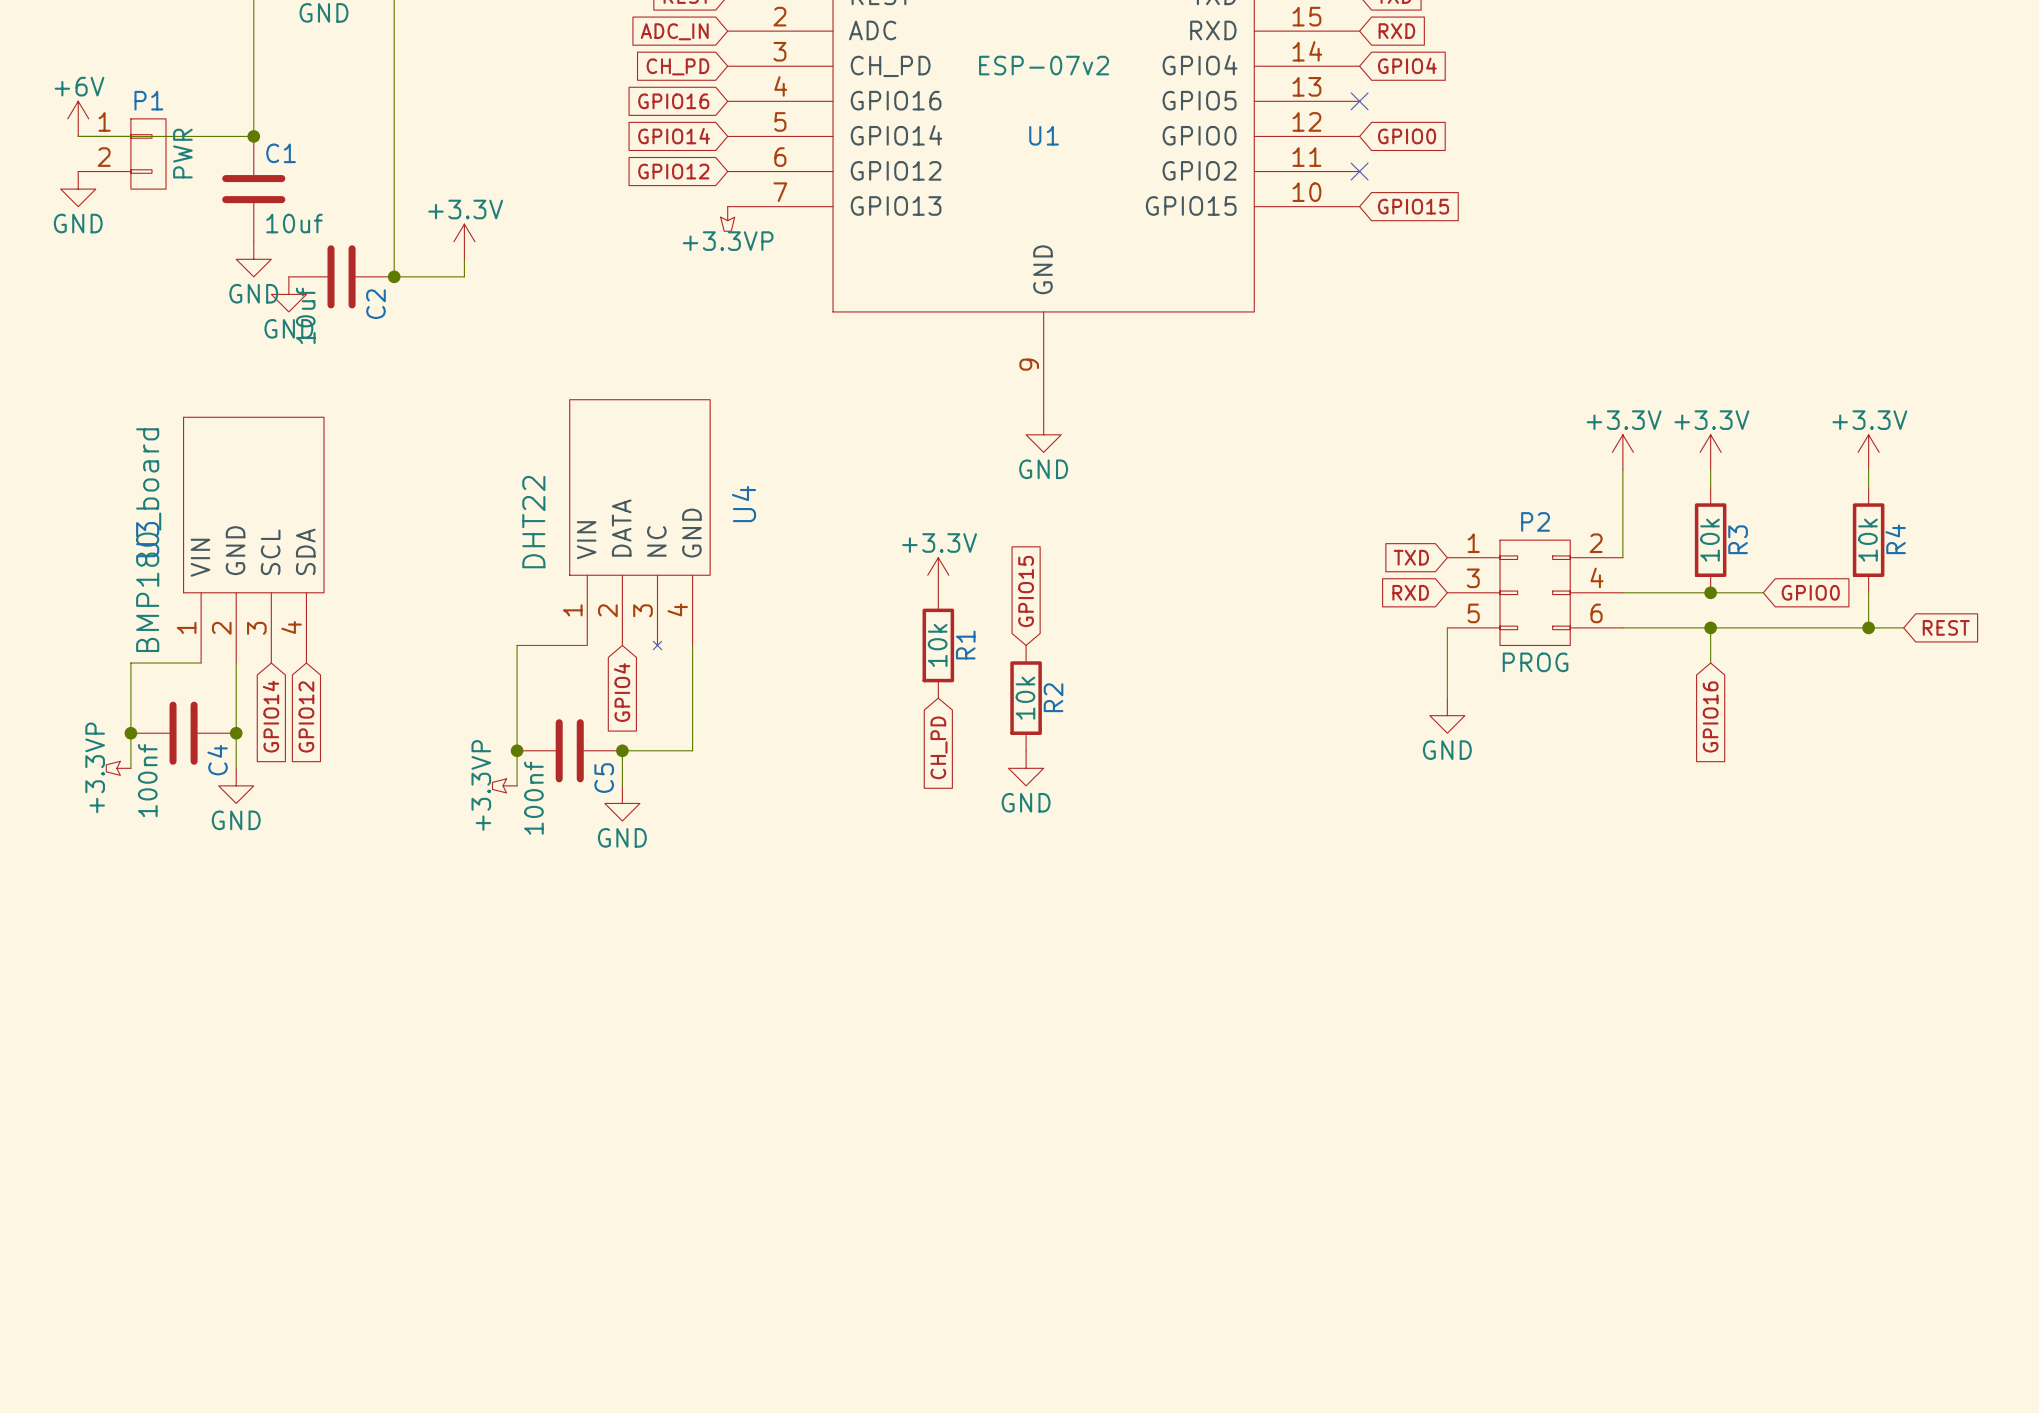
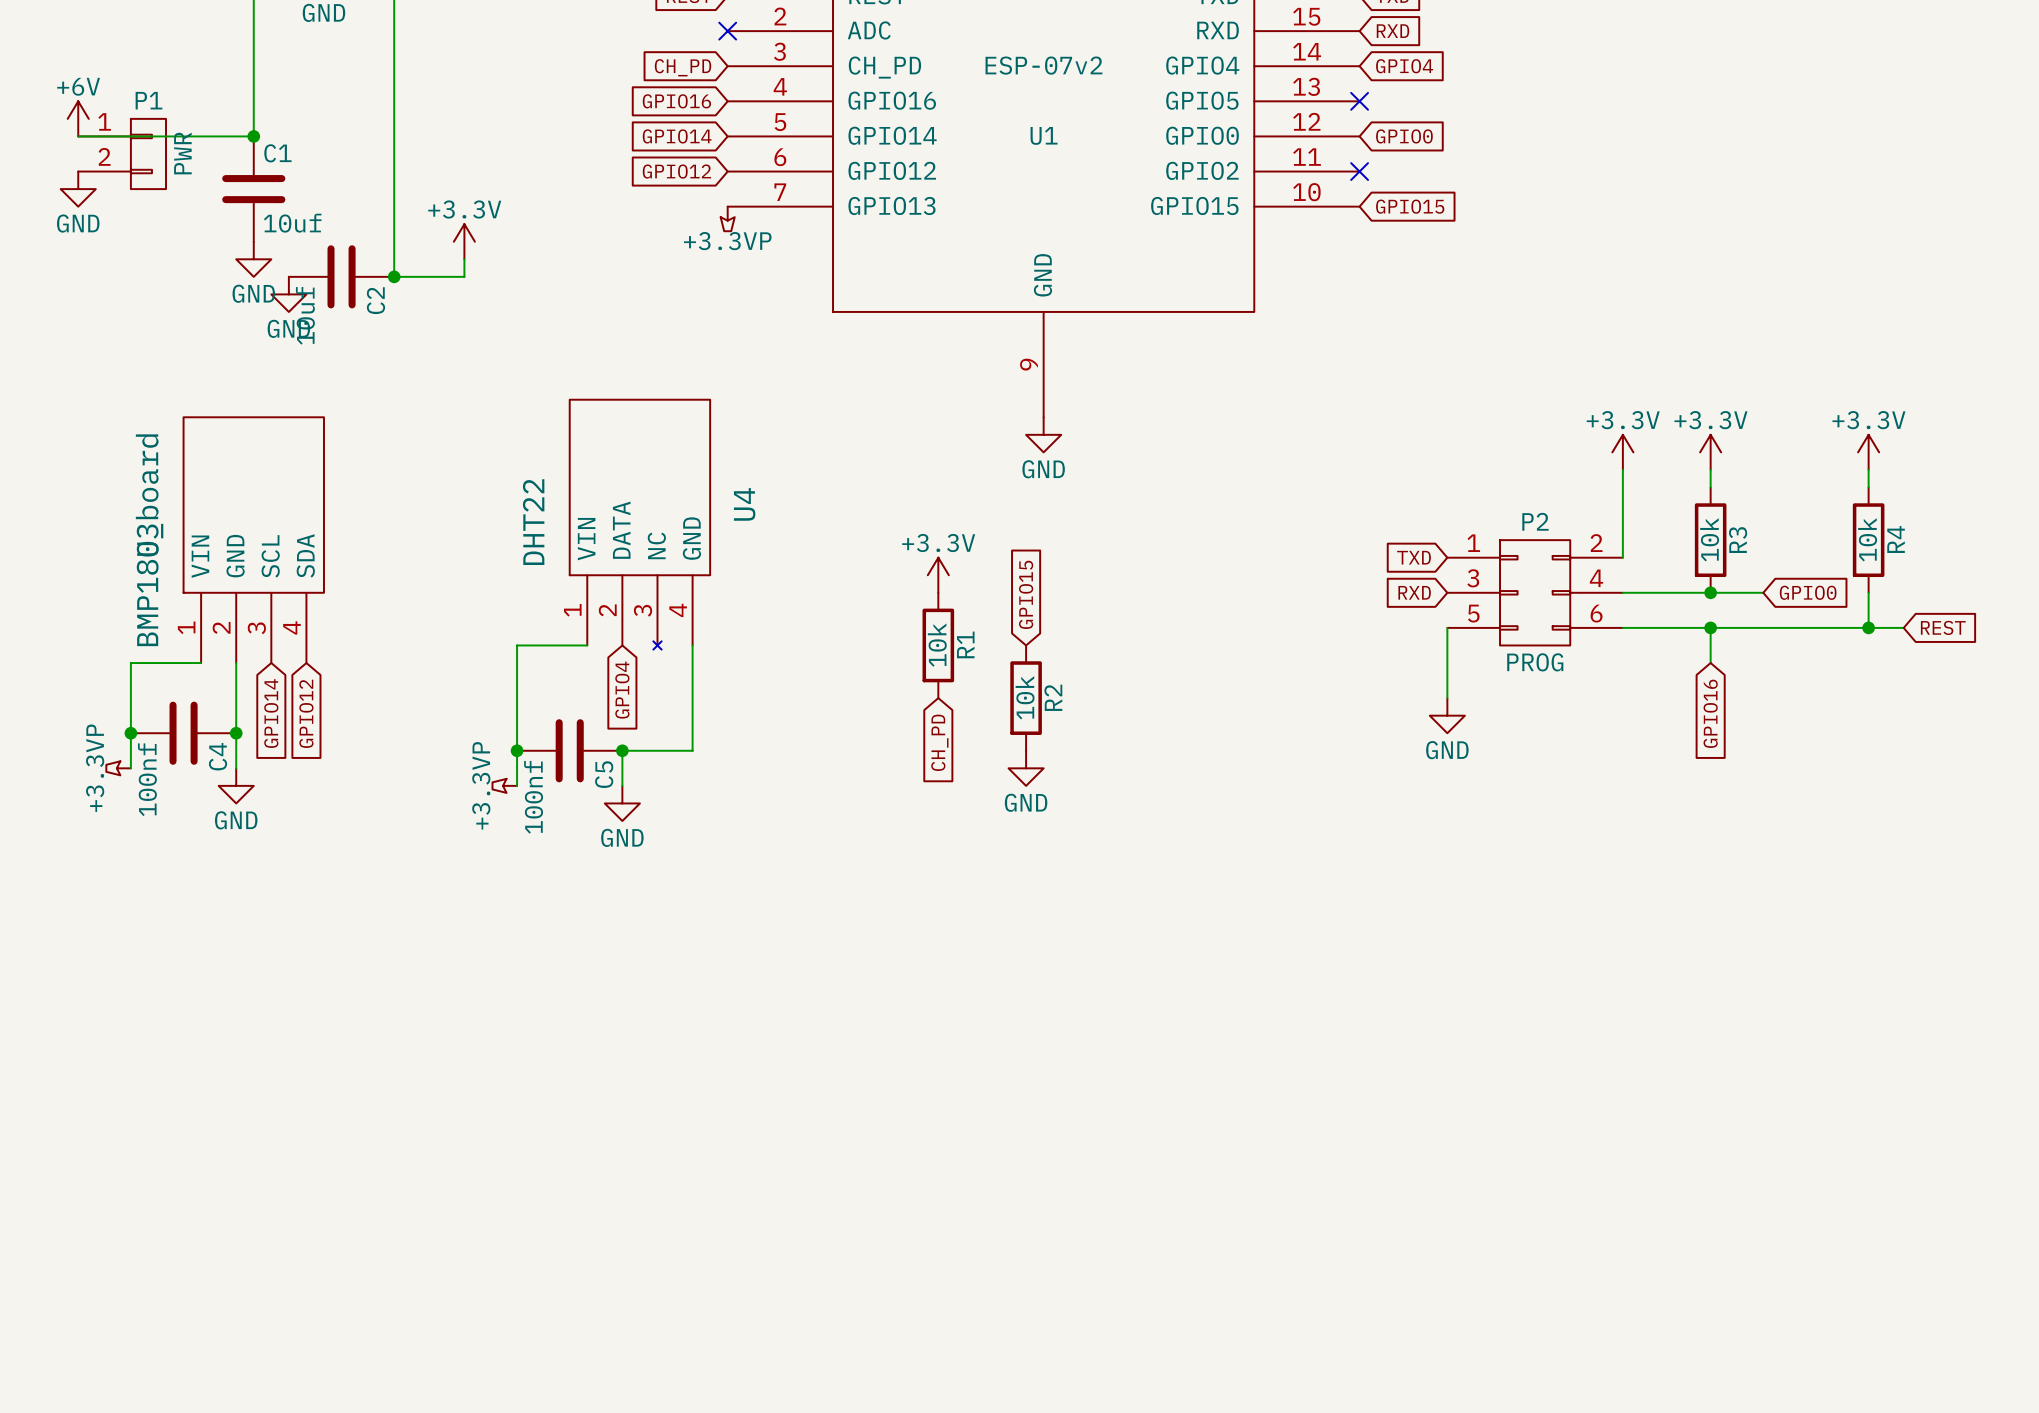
global label: ADC_IN (674, 31) -> none
no-connect mark: none -> (727, 31)

